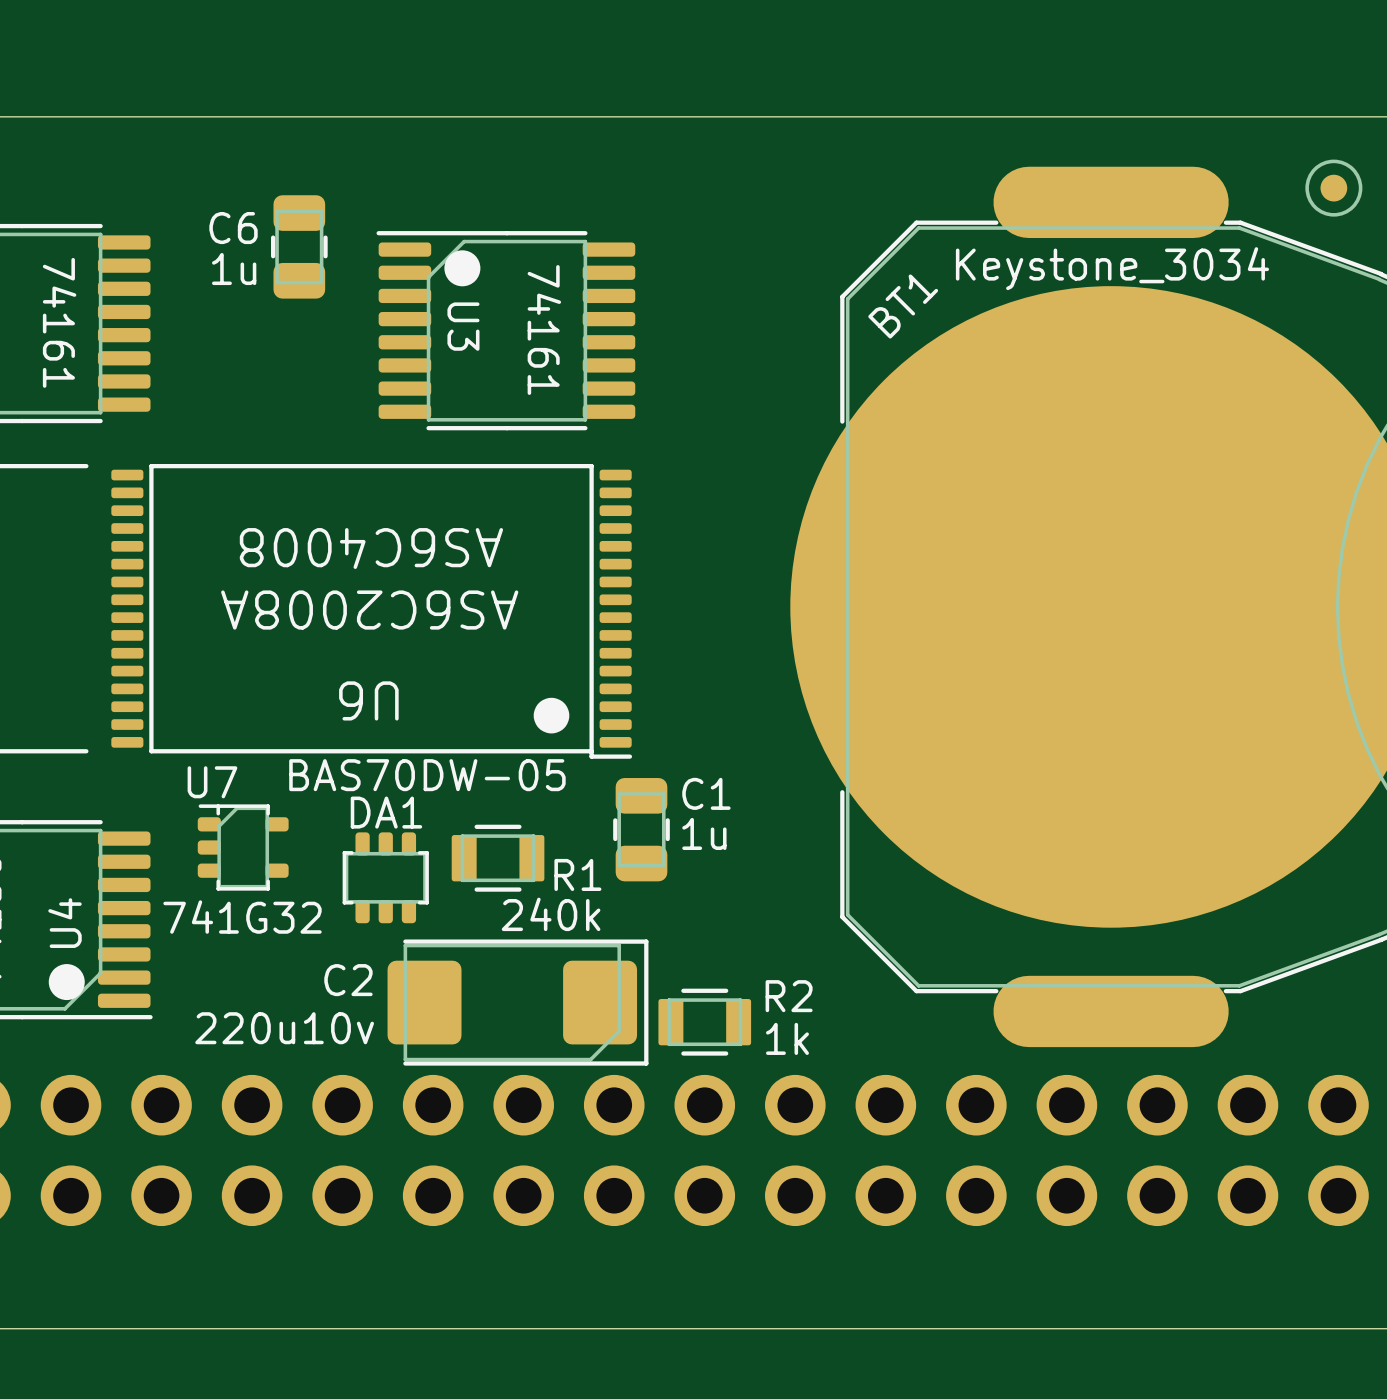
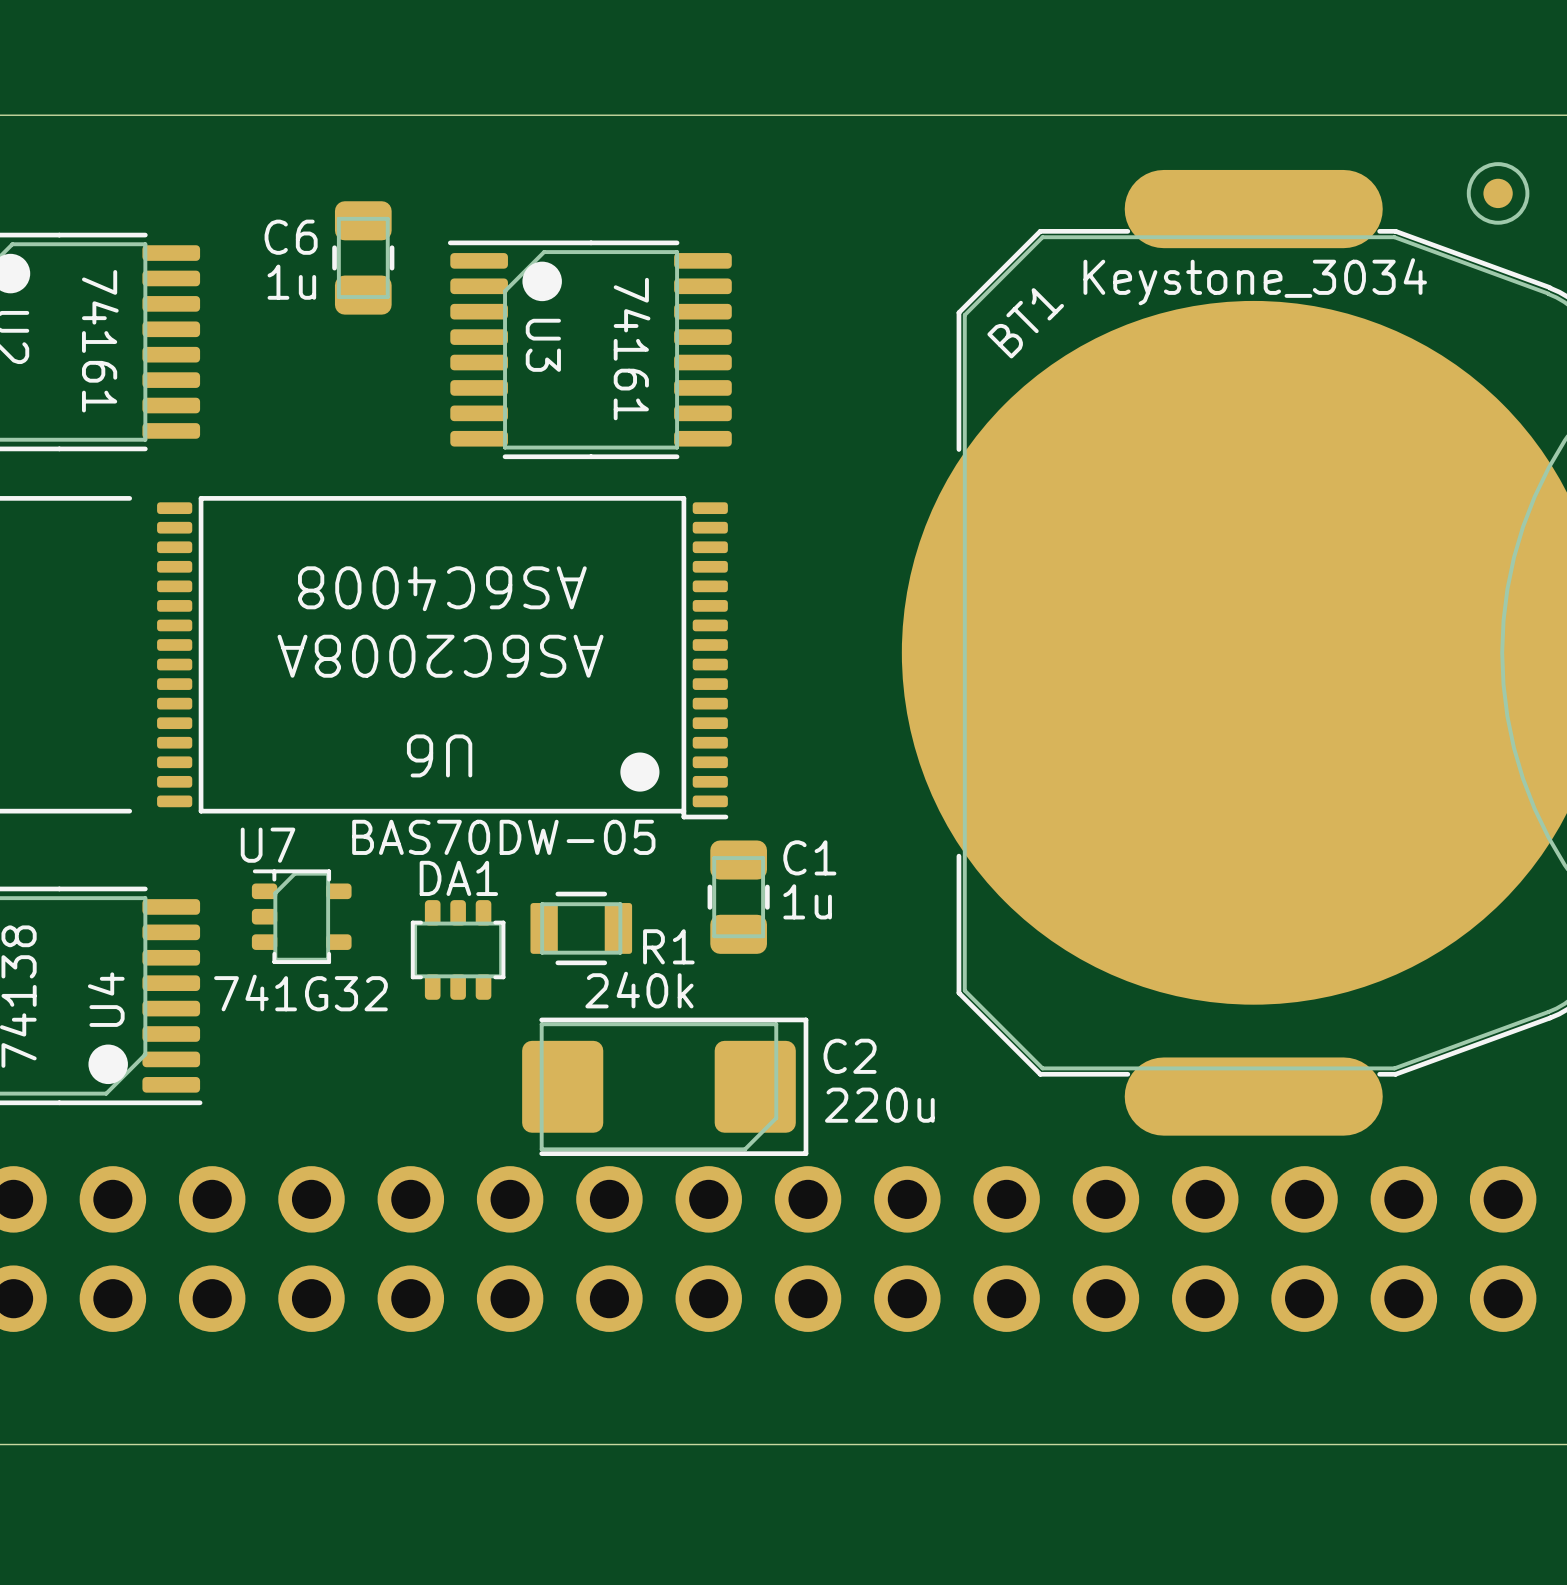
C2 name position: C2 (348, 980) -> C2 (850, 1056)
C2 position: (518, 1002) -> (665, 1086)
R2: 1k (704, 1022) -> none
C2 value: 220u10v (284, 1028) -> 220u (879, 1105)

